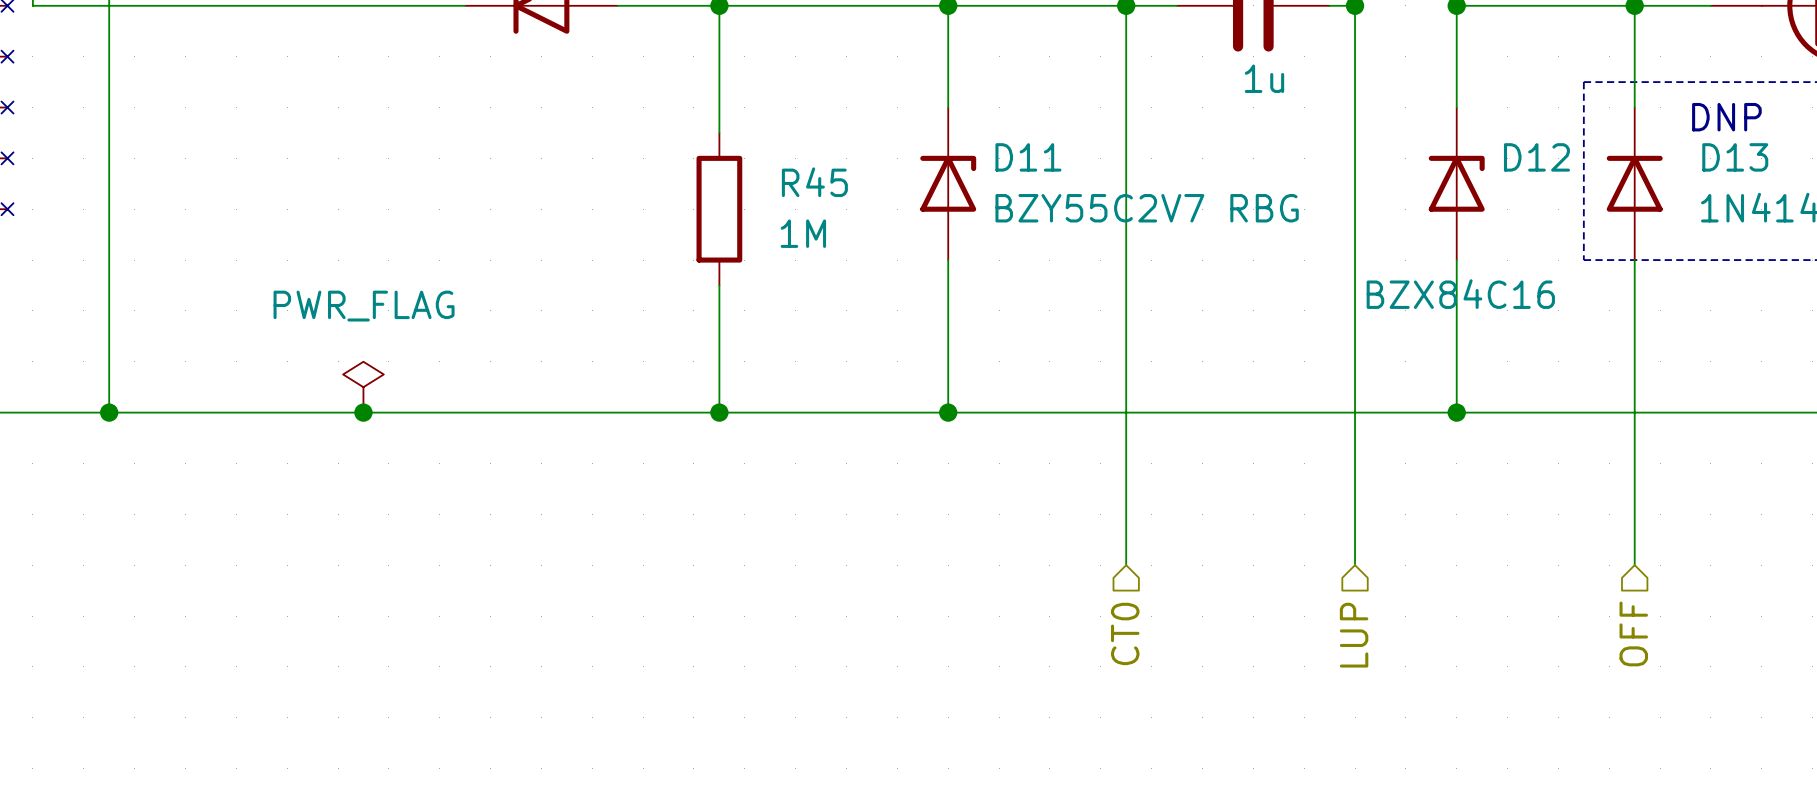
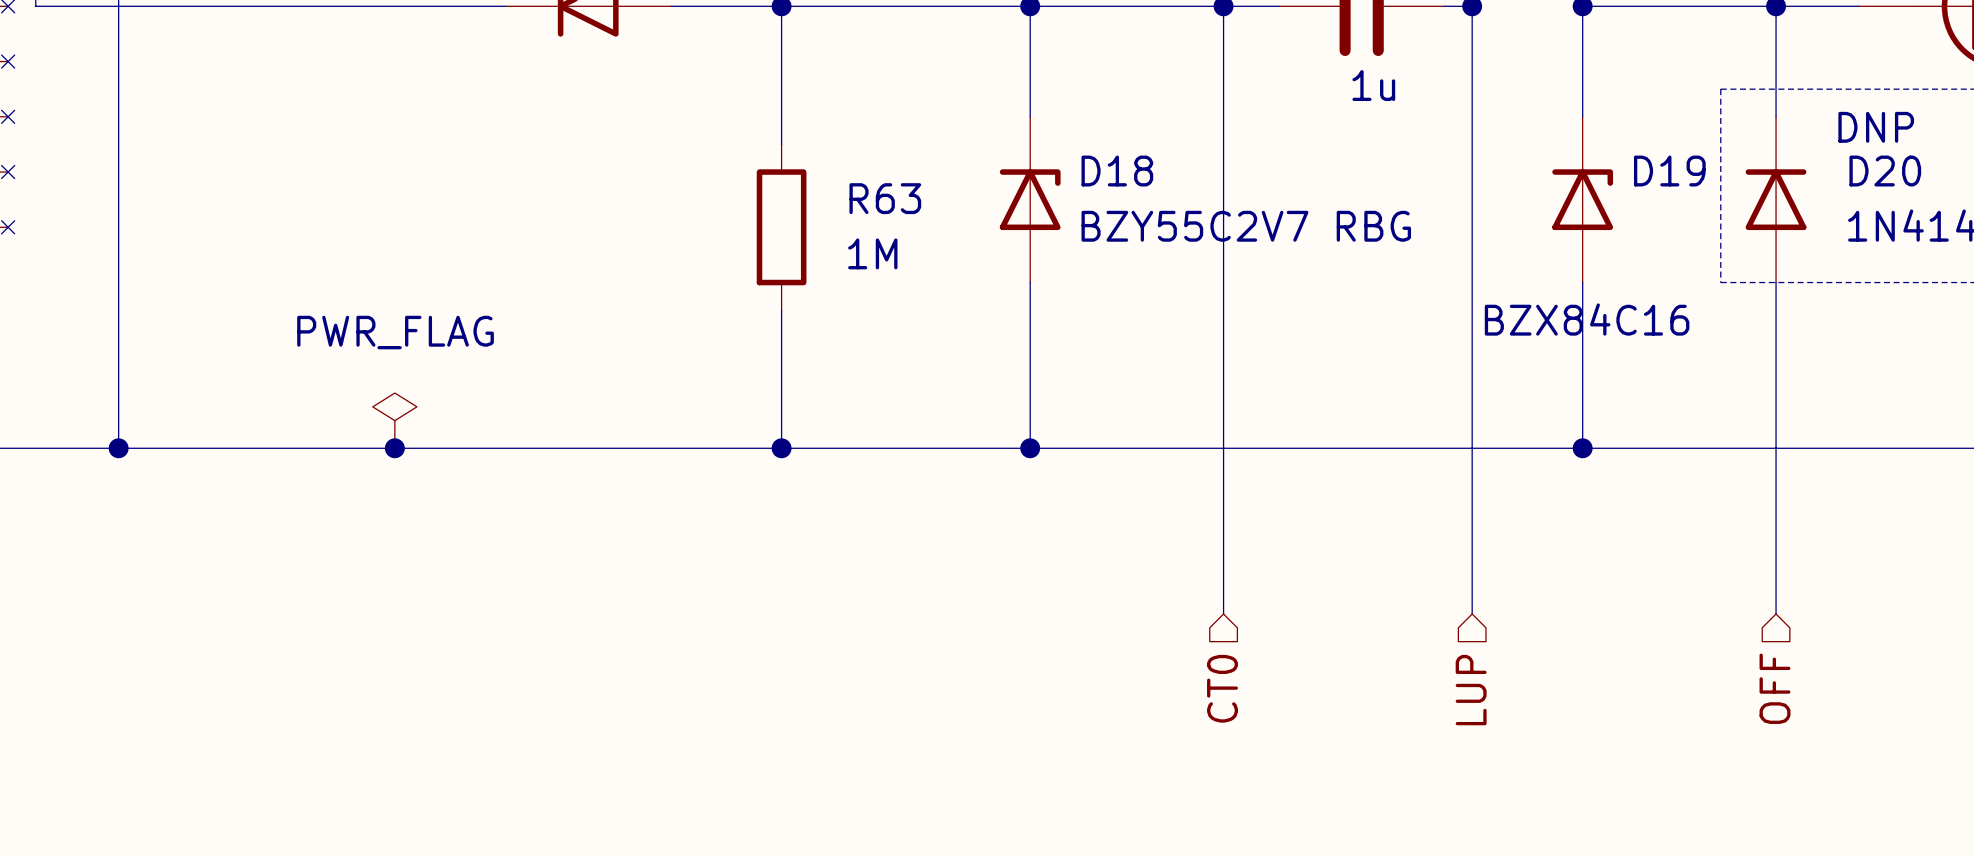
D11 name: D11 (1028, 157) -> D18 (1117, 171)
D12 name: D12 (1536, 157) -> D19 (1669, 171)
D13 name: D13 (1735, 157) -> D20 (1885, 171)
R45 name: R45 (814, 182) -> R63 (885, 198)

